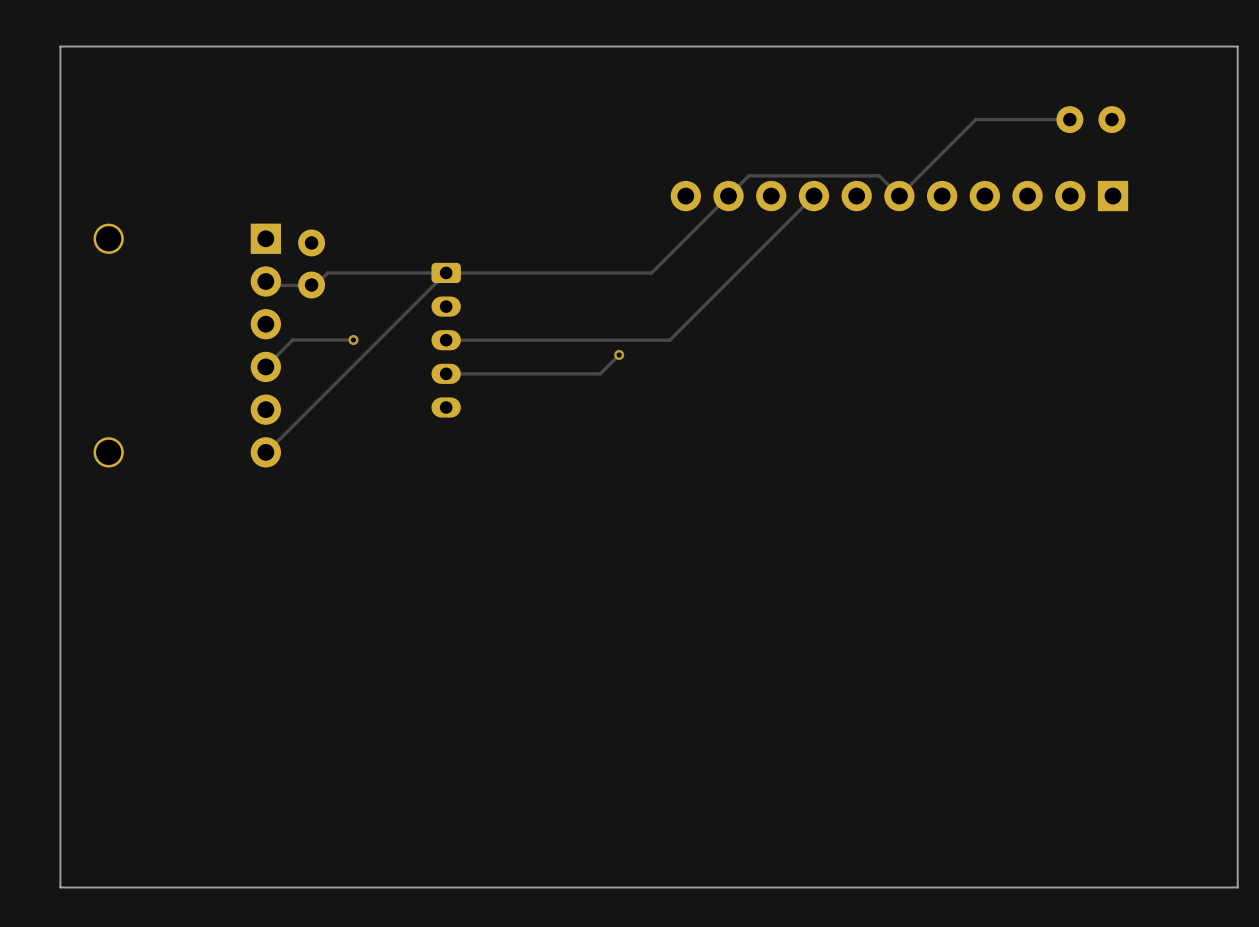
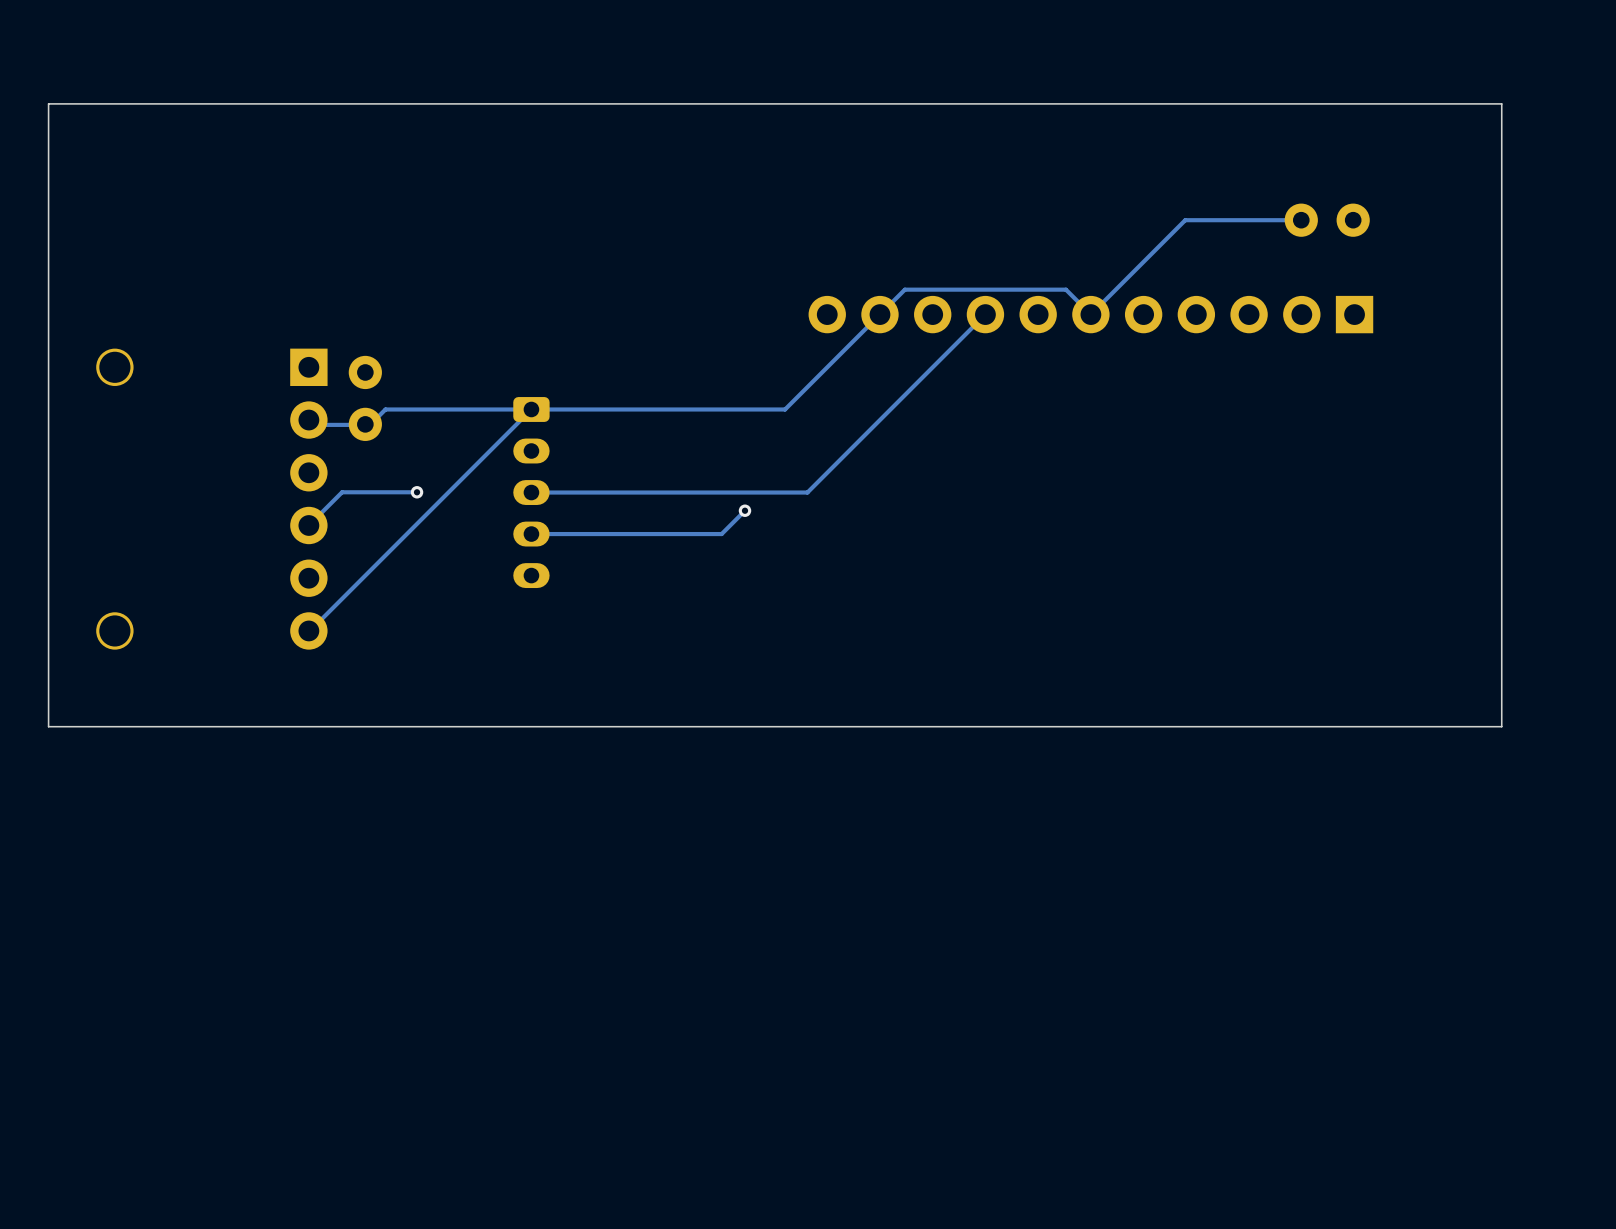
board edge: (1237, 46) (60, 46) (60, 887) (1237, 887) (1237, 46) -> (1501, 103) (1501, 726) (48, 726) (48, 103) (1501, 103)

